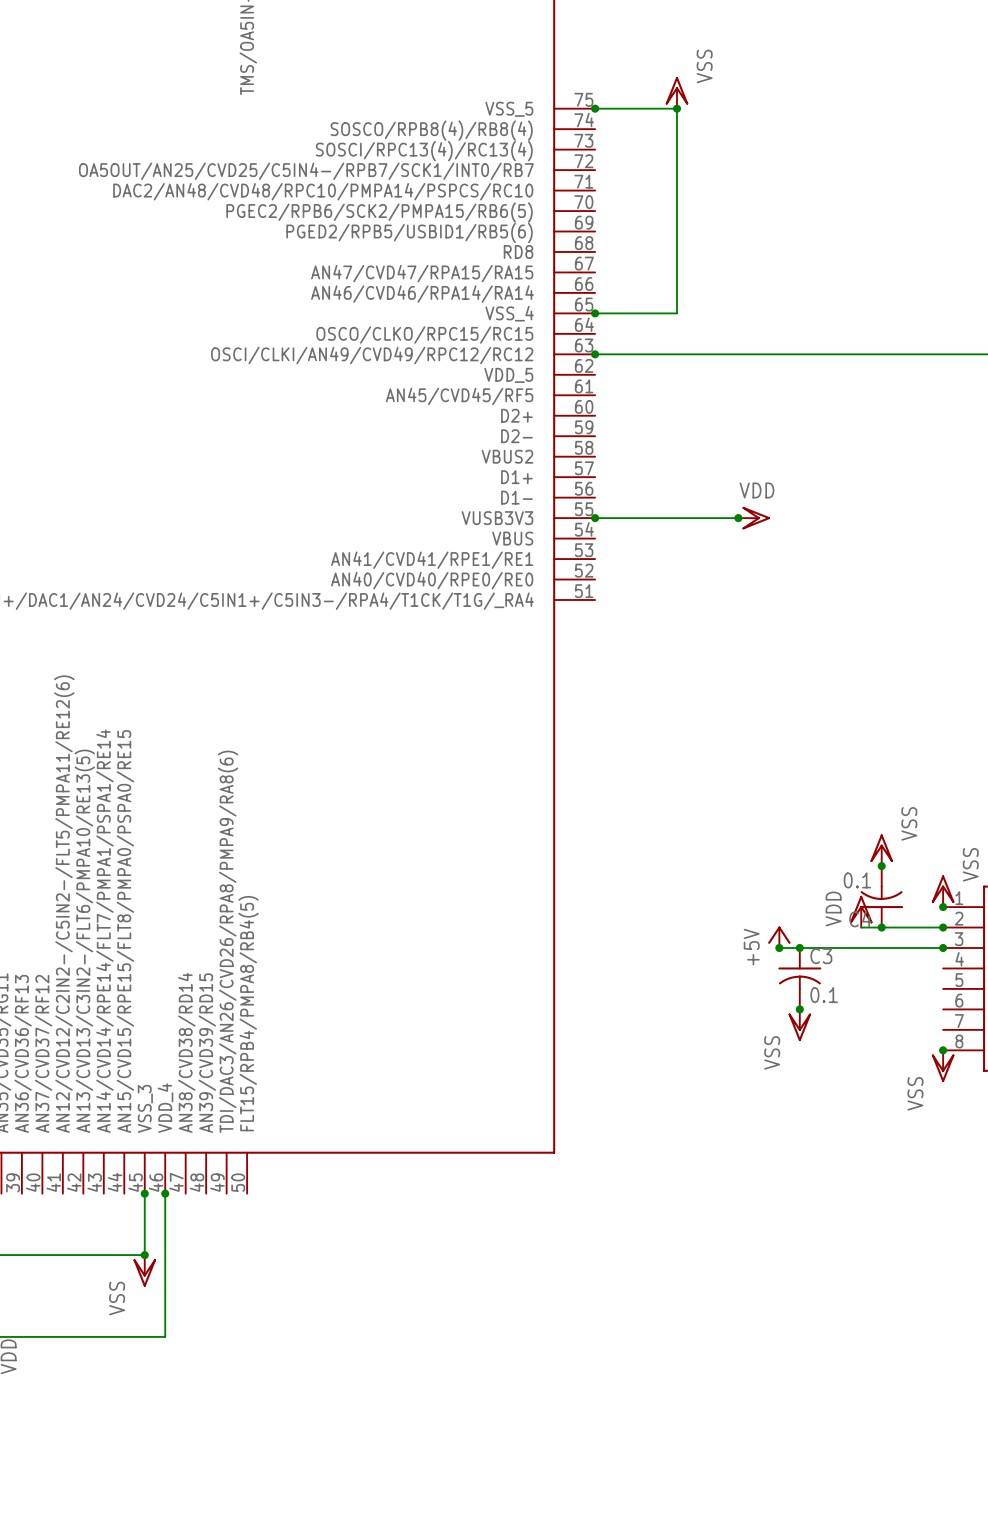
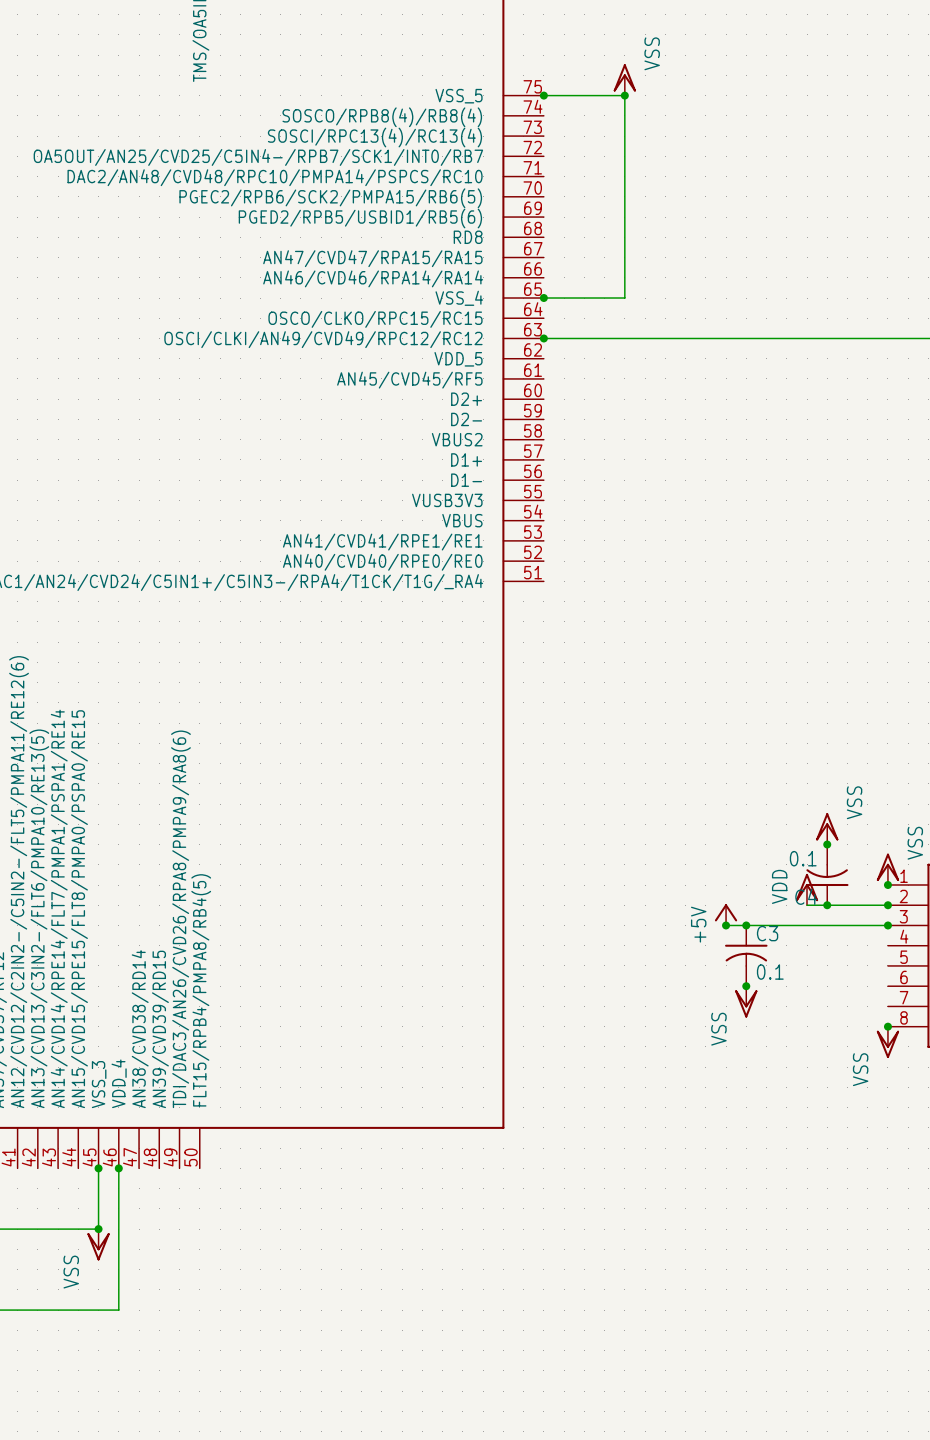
wire: (595, 518) (738, 518) -> none
junction: (595, 518) -> none
junction: (738, 518) -> none
power symbol: VDD (754, 518) -> none

